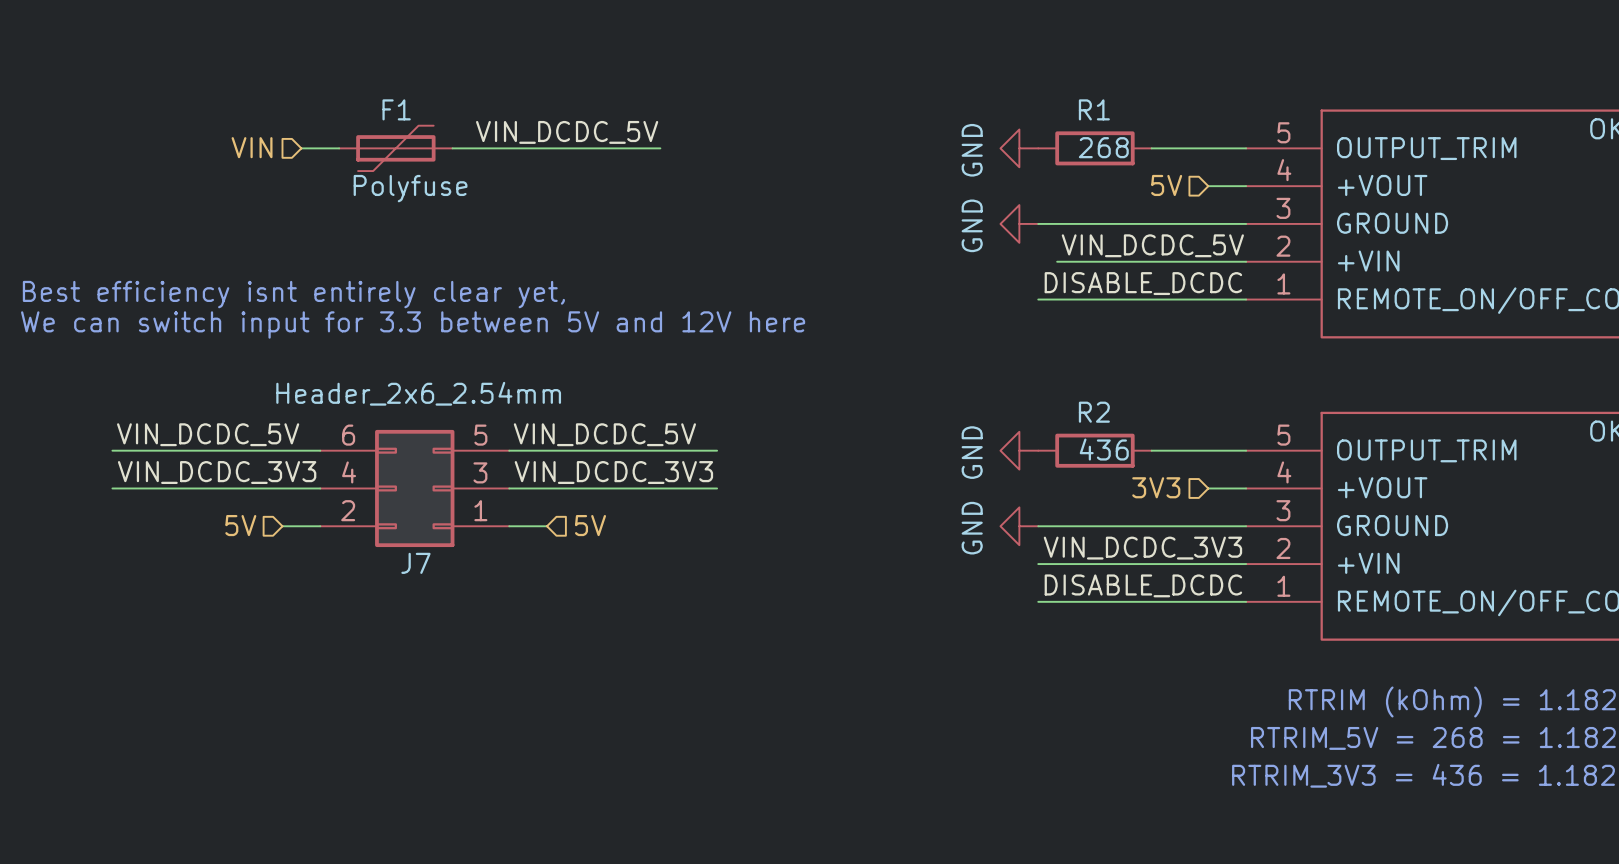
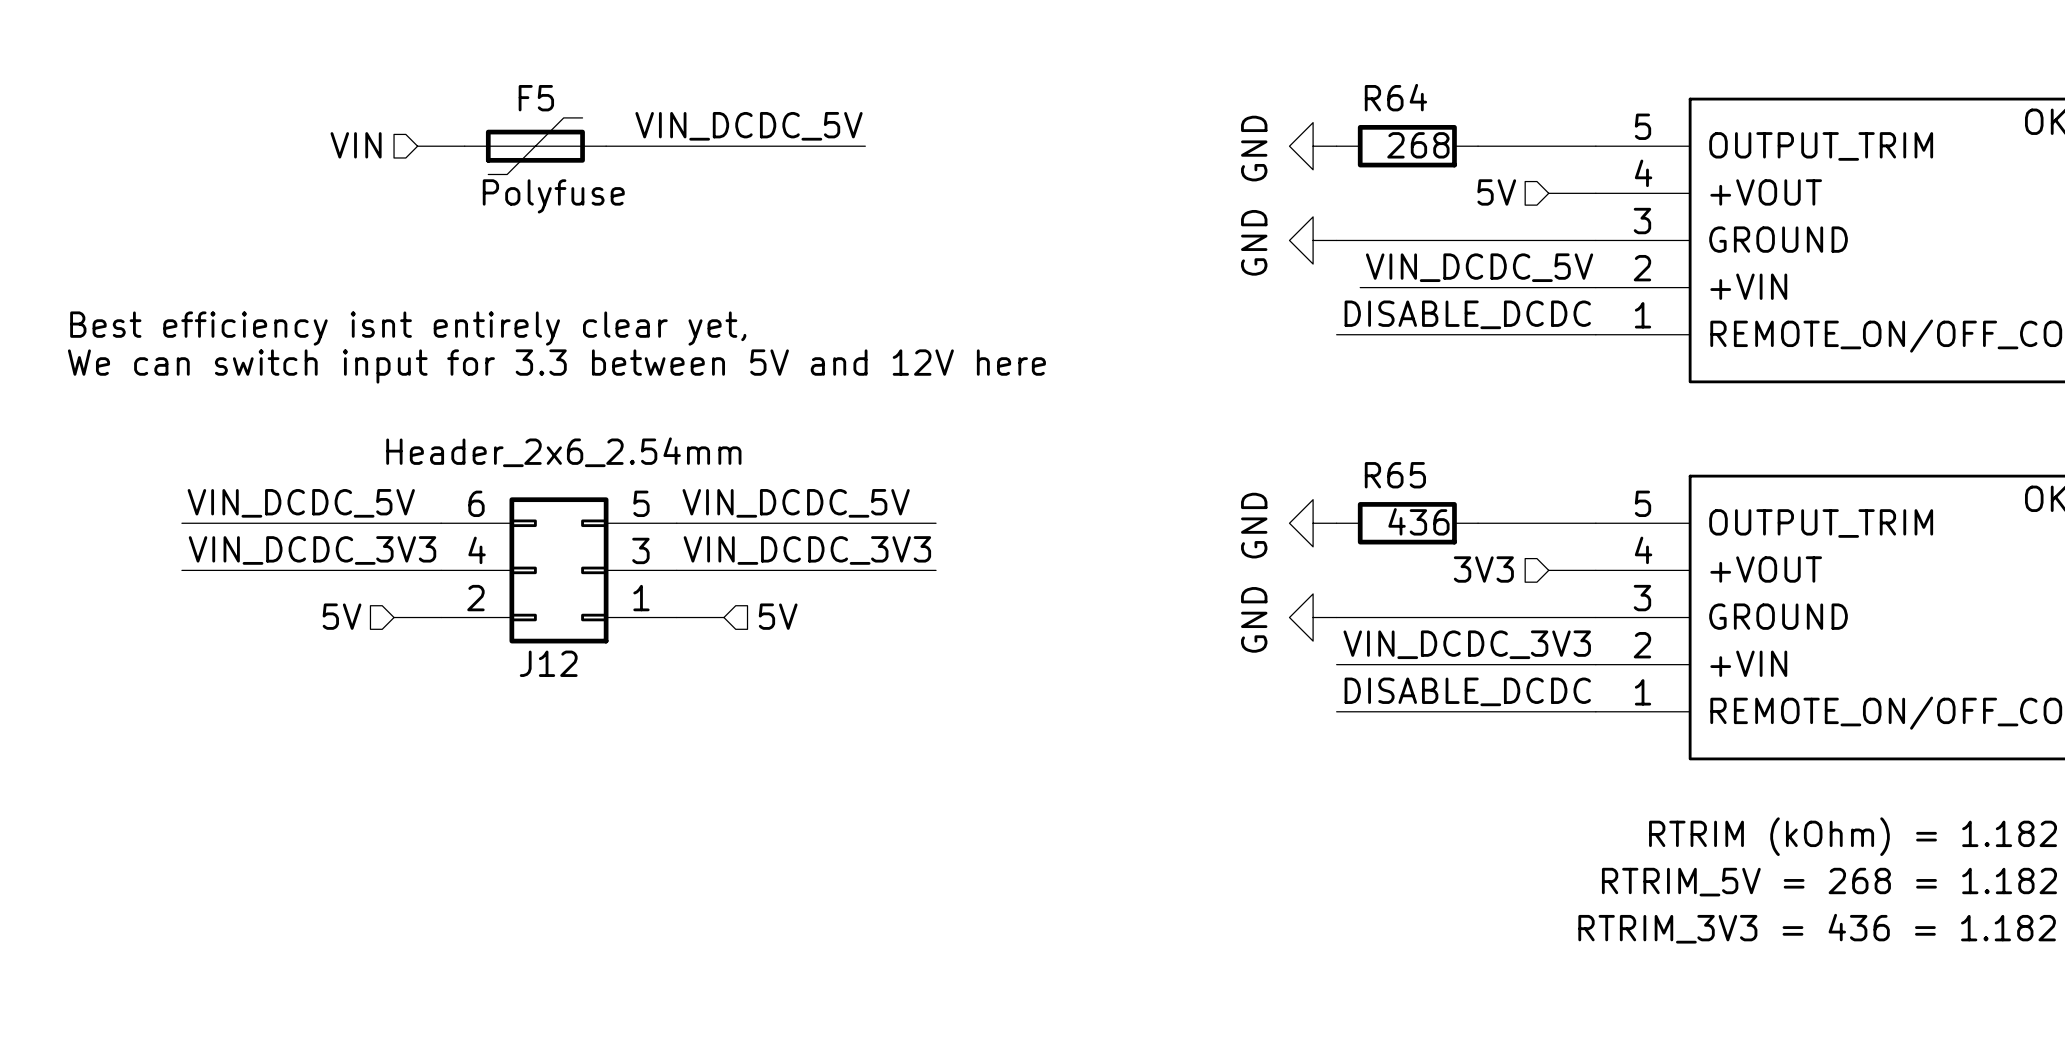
F1 name: F1 (396, 109) -> F5 (536, 98)
R1 name: R1 (1094, 109) -> R64 (1395, 97)
R2 name: R2 (1094, 412) -> R65 (1395, 475)
J7 name: J7 (415, 563) -> J12 (548, 663)

